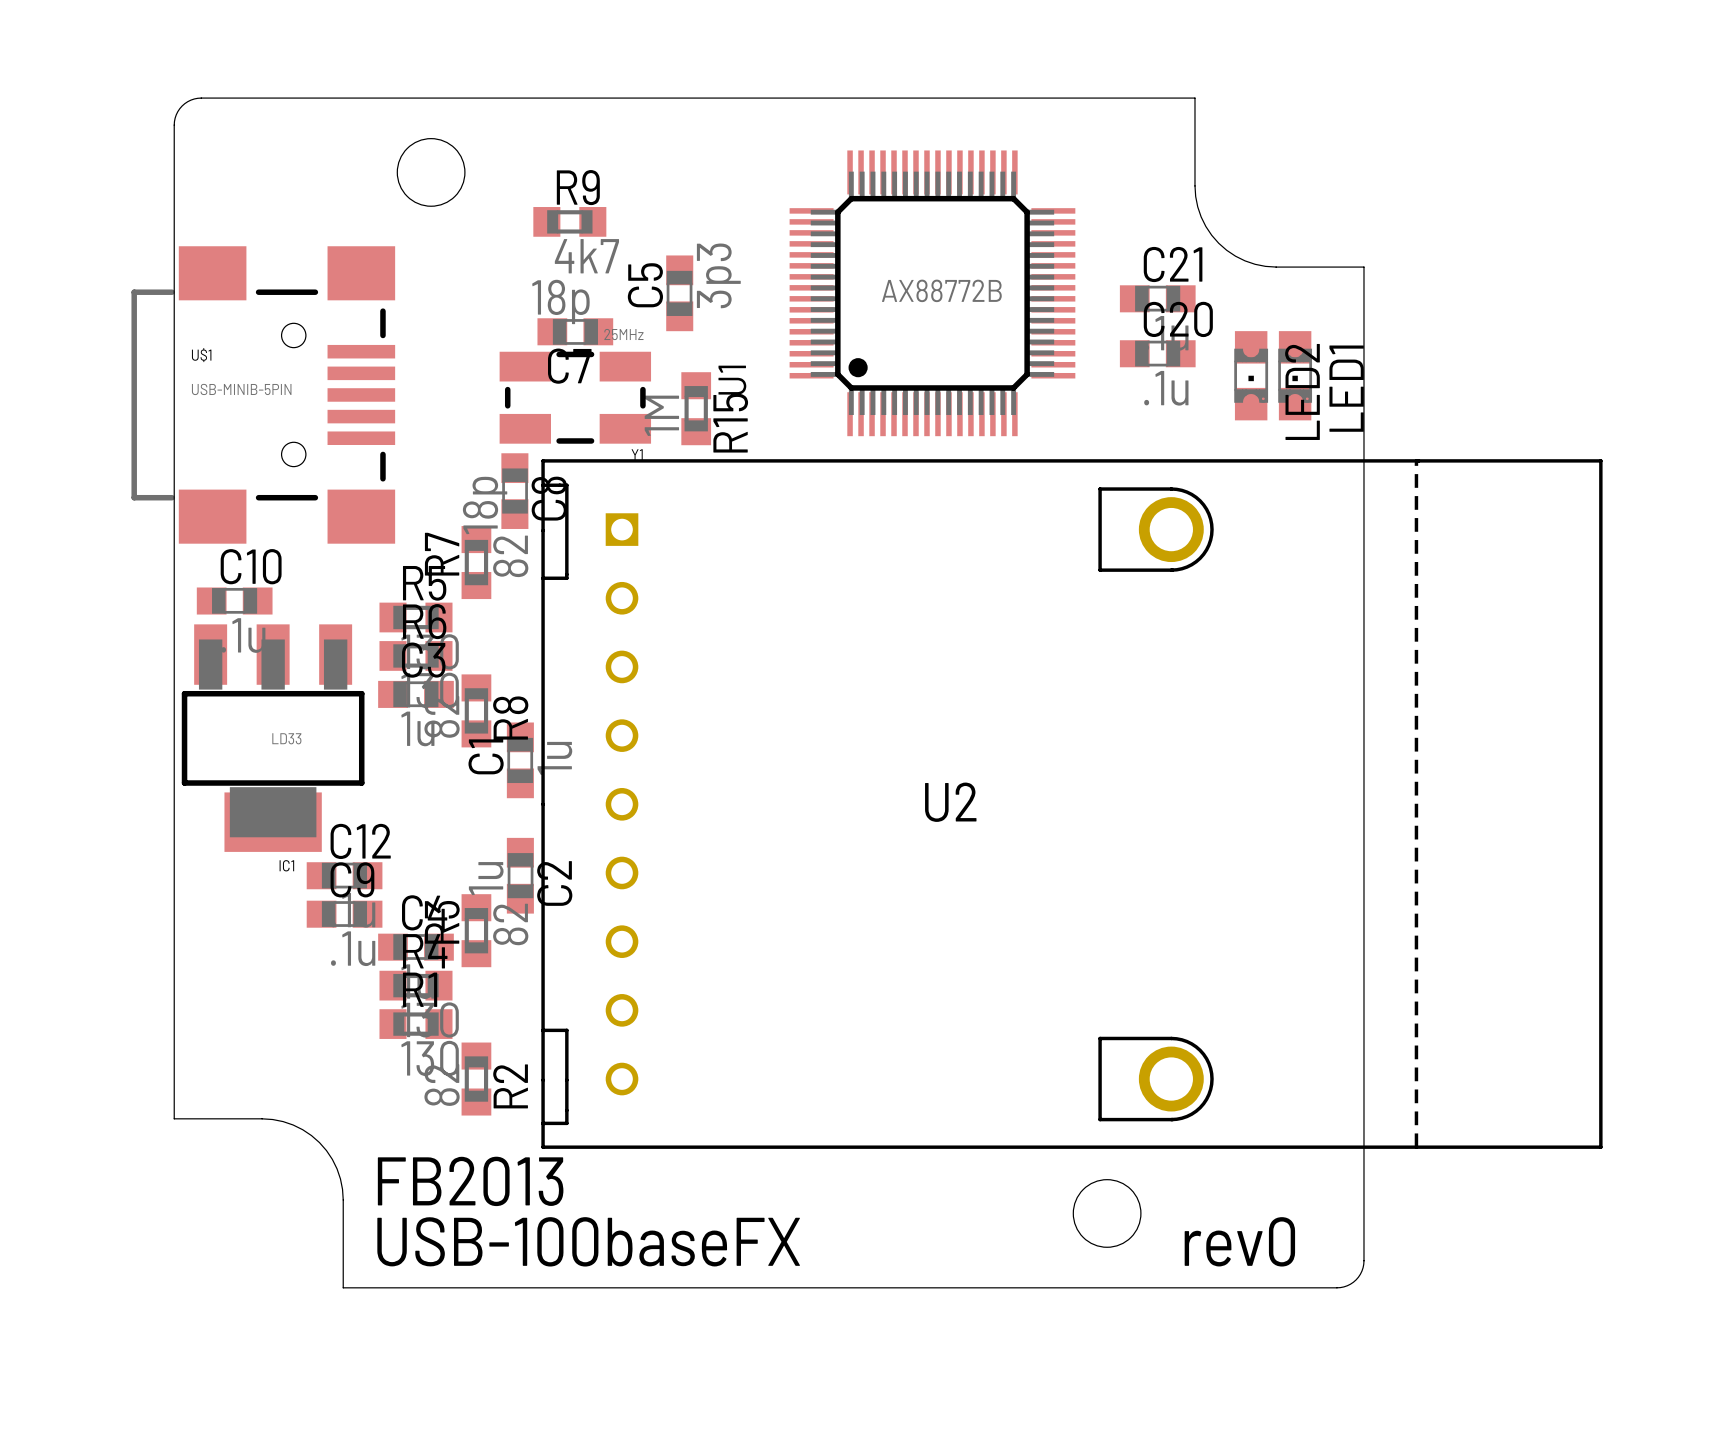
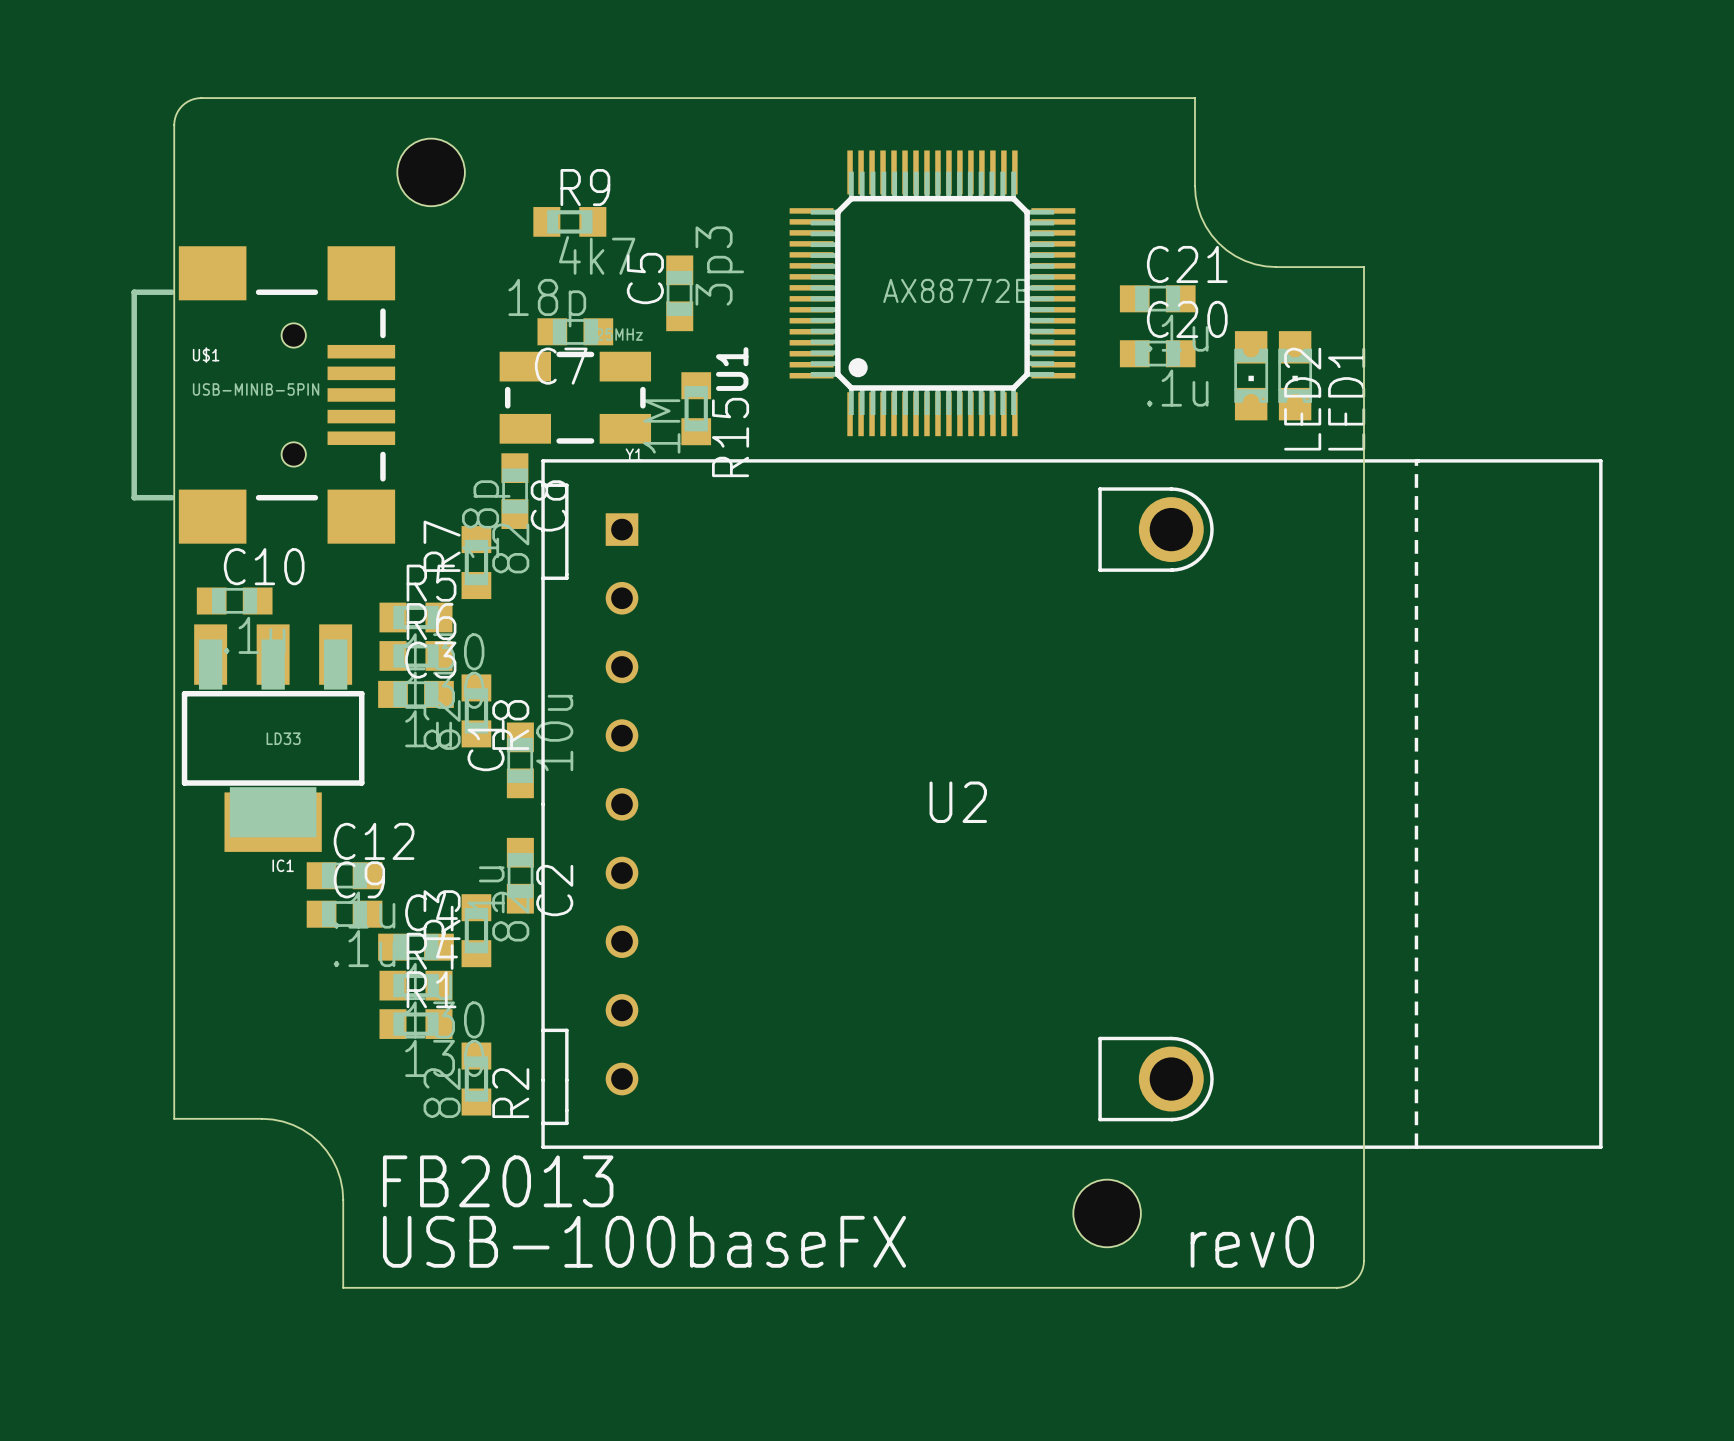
C1 value: 1u (554, 758) -> 10u (554, 733)

